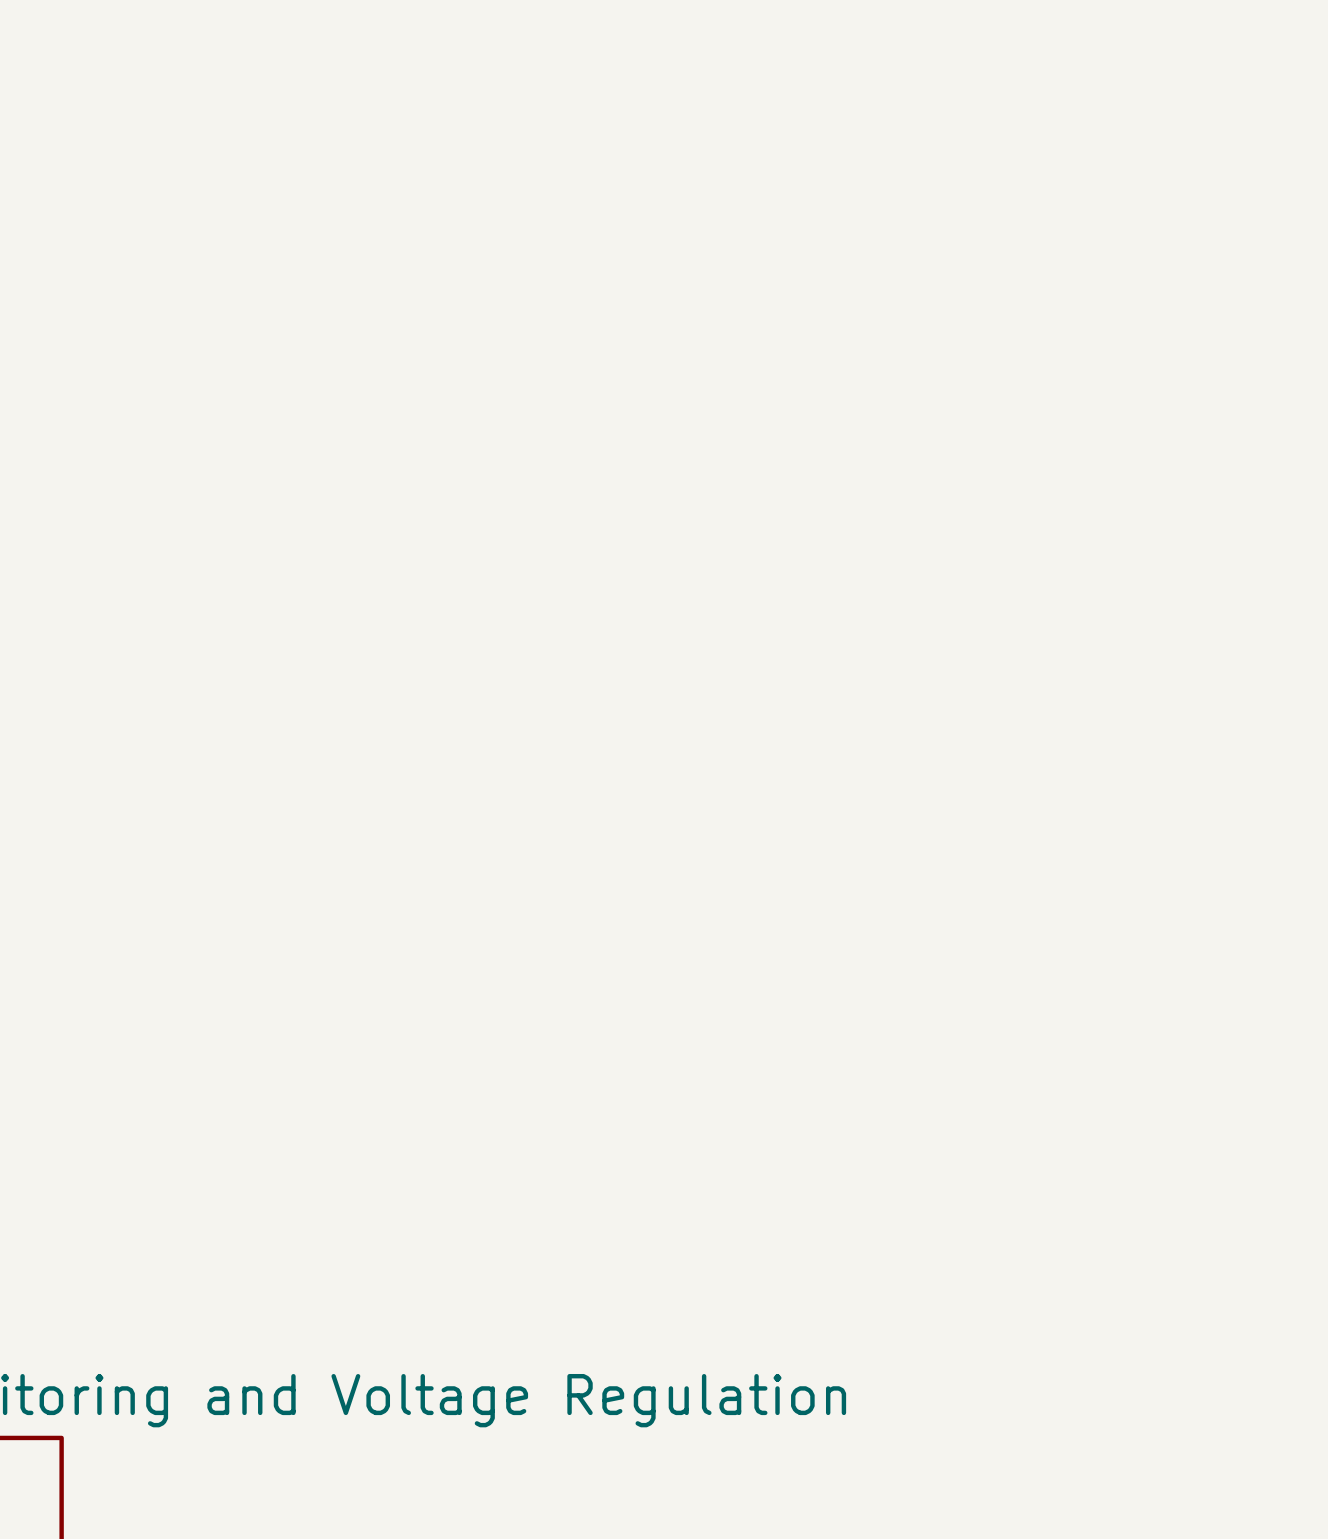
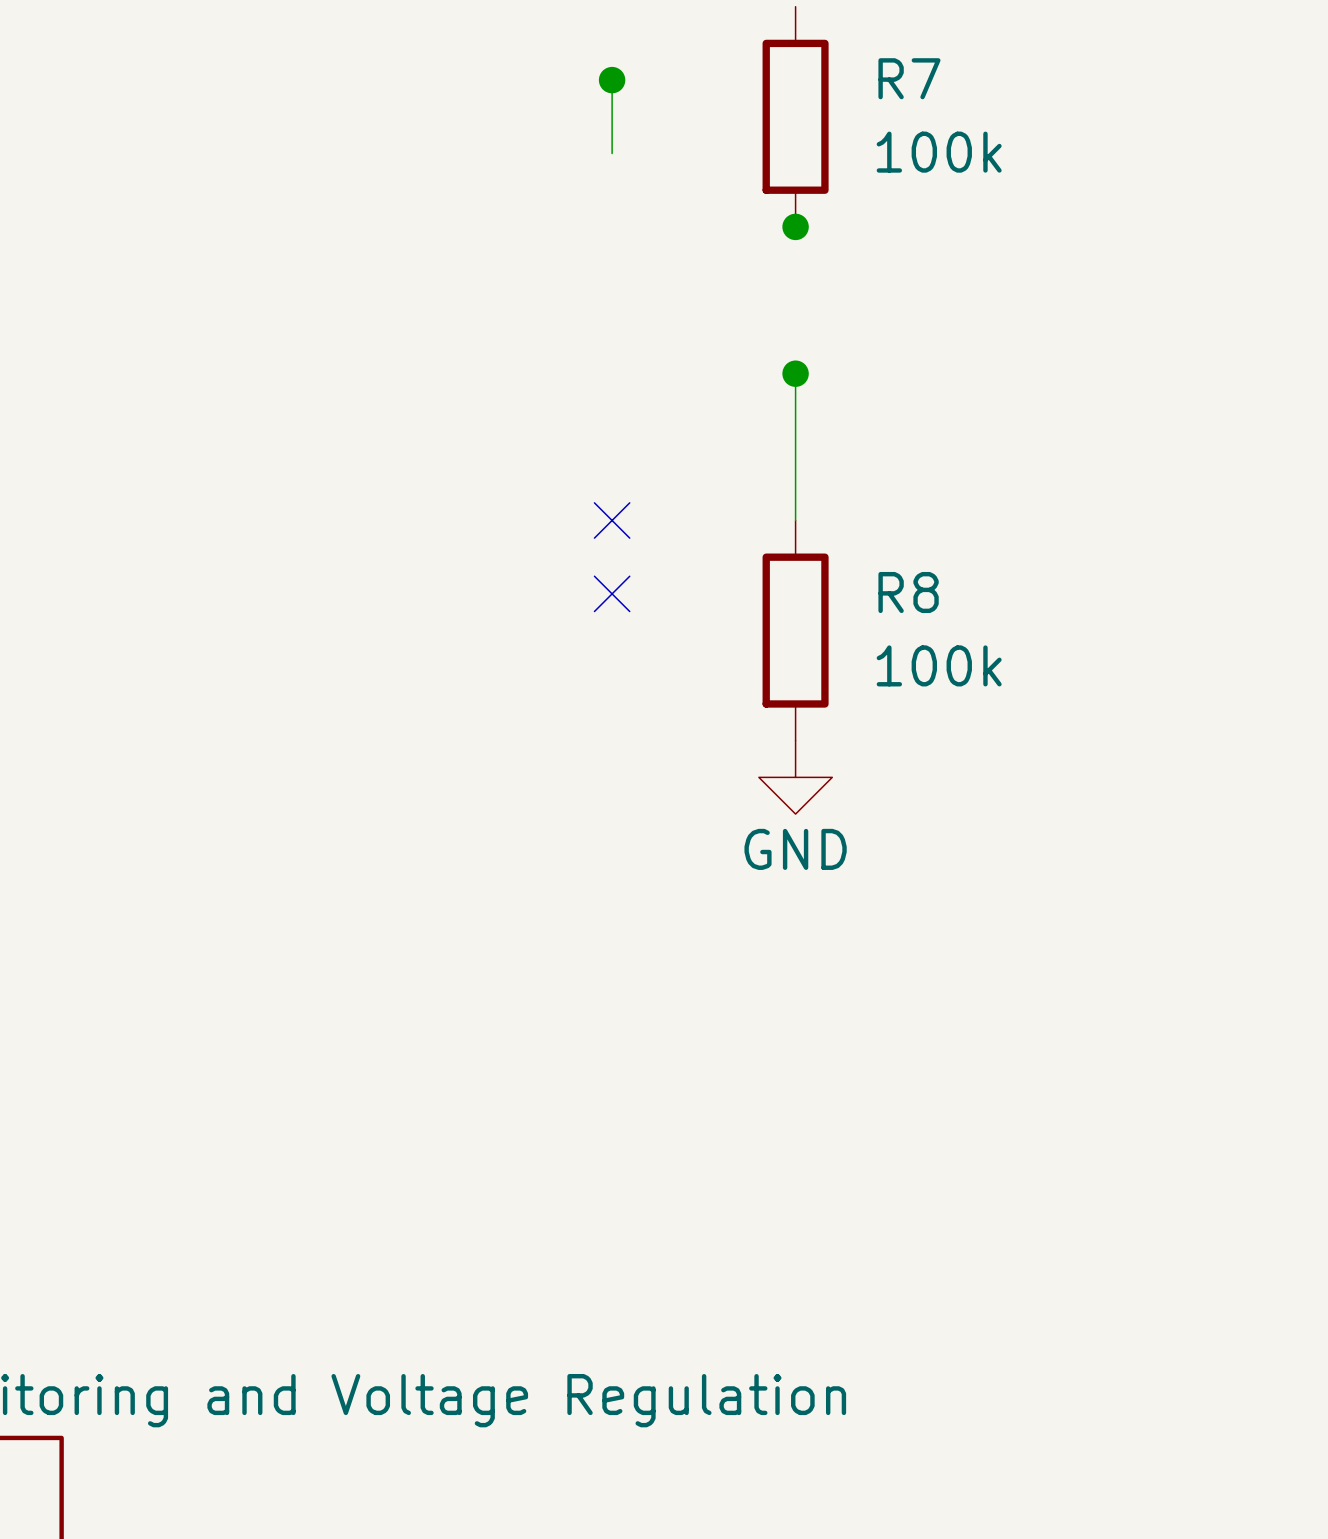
wire: none -> (612, 80) (612, 153)
junction: none -> (612, 80)
R7: none -> 100k (795, 116)
junction: none -> (795, 226)
wire: none -> (795, 373) (795, 520)
junction: none -> (795, 373)
no-connect mark: none -> (612, 520)
no-connect mark: none -> (612, 593)
R8: none -> 100k (795, 630)
power symbol: none -> GND (795, 777)

